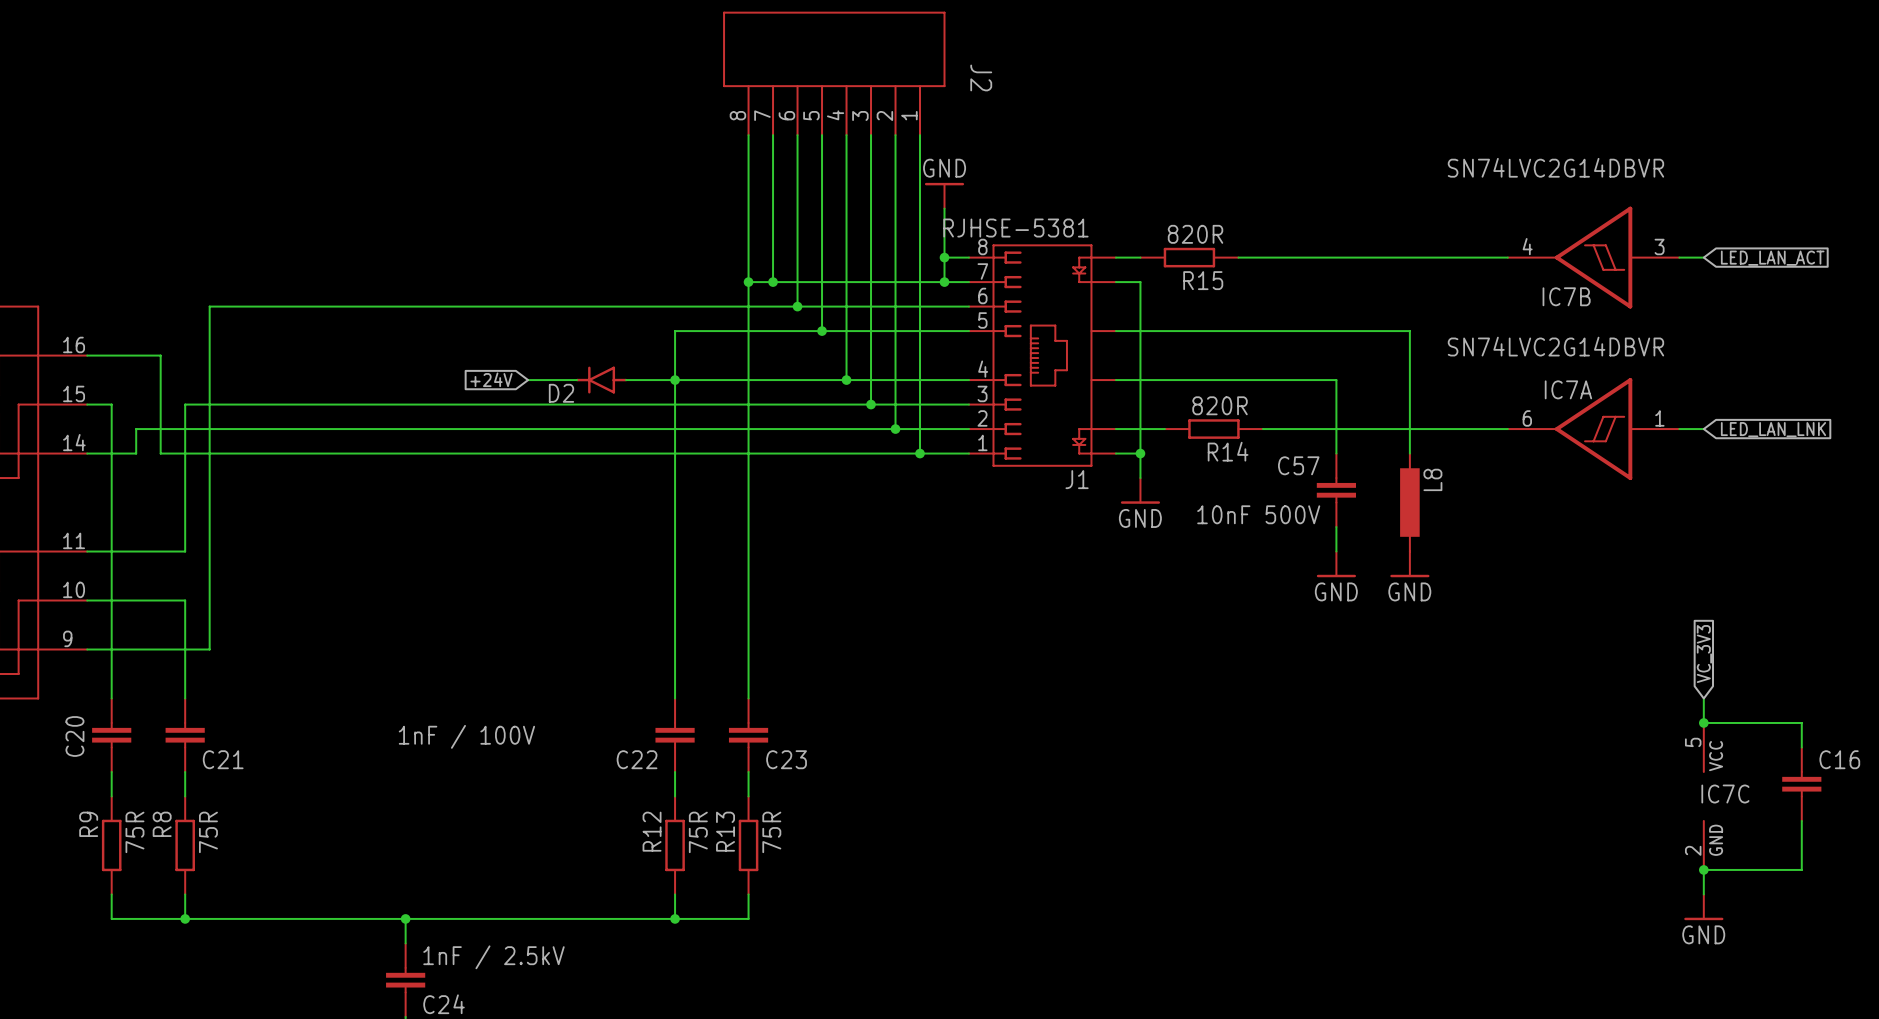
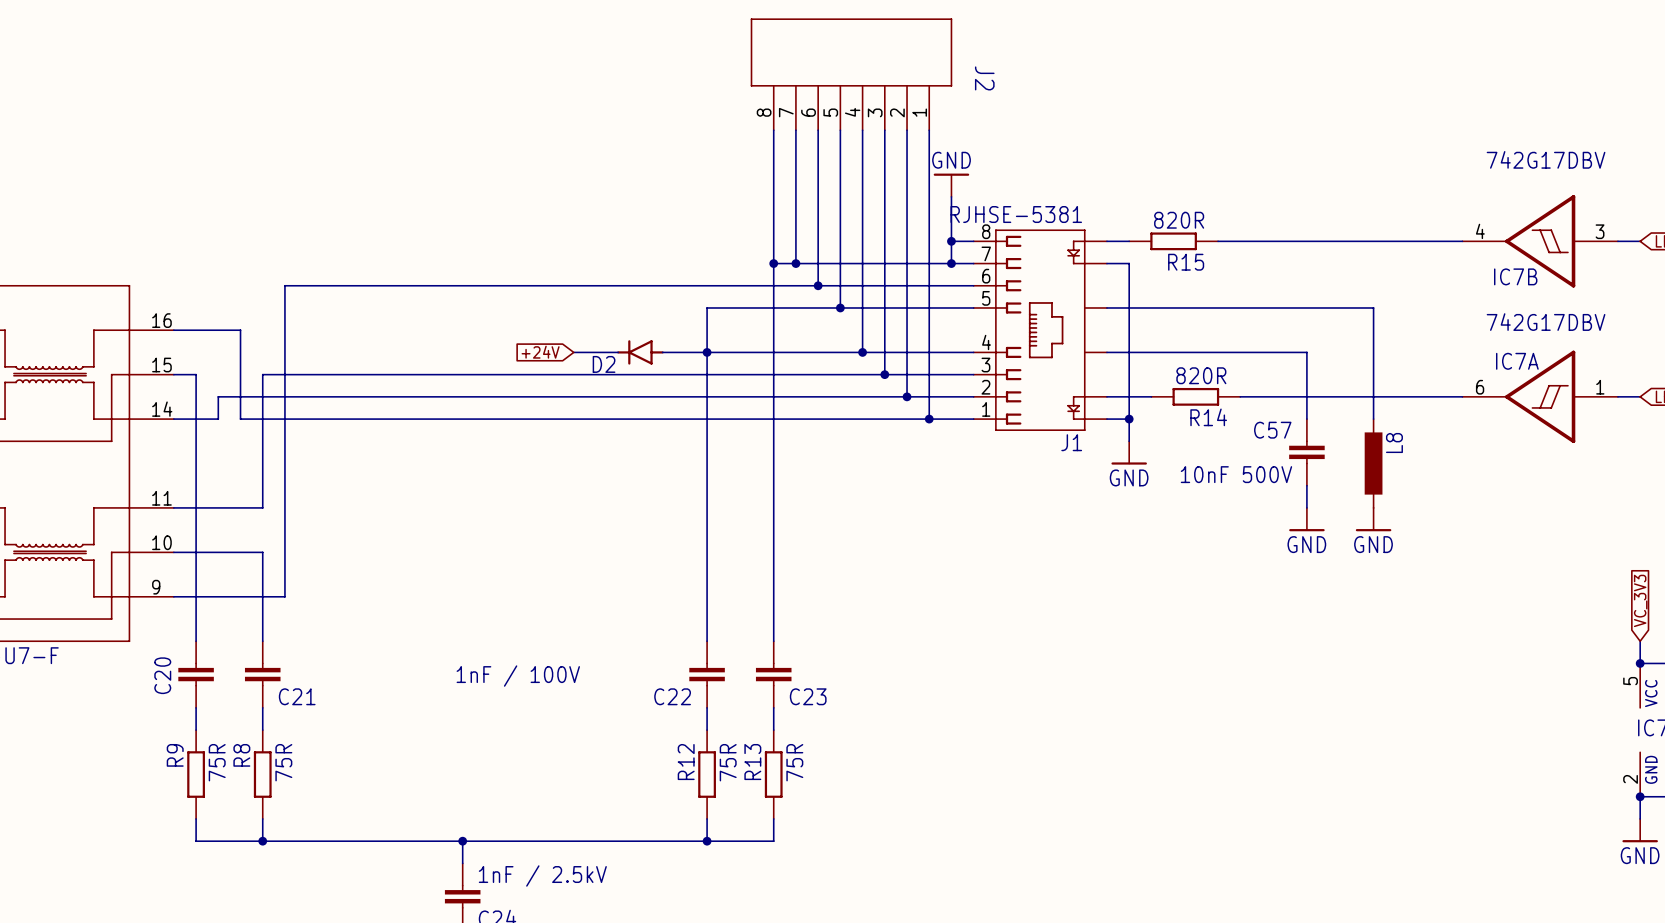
IC7B value: SN74LVC2G14DBVR (1555, 167) -> 742G17DBV (1546, 159)
IC7A value: SN74LVC2G14DBVR (1555, 346) -> 742G17DBV (1546, 322)

